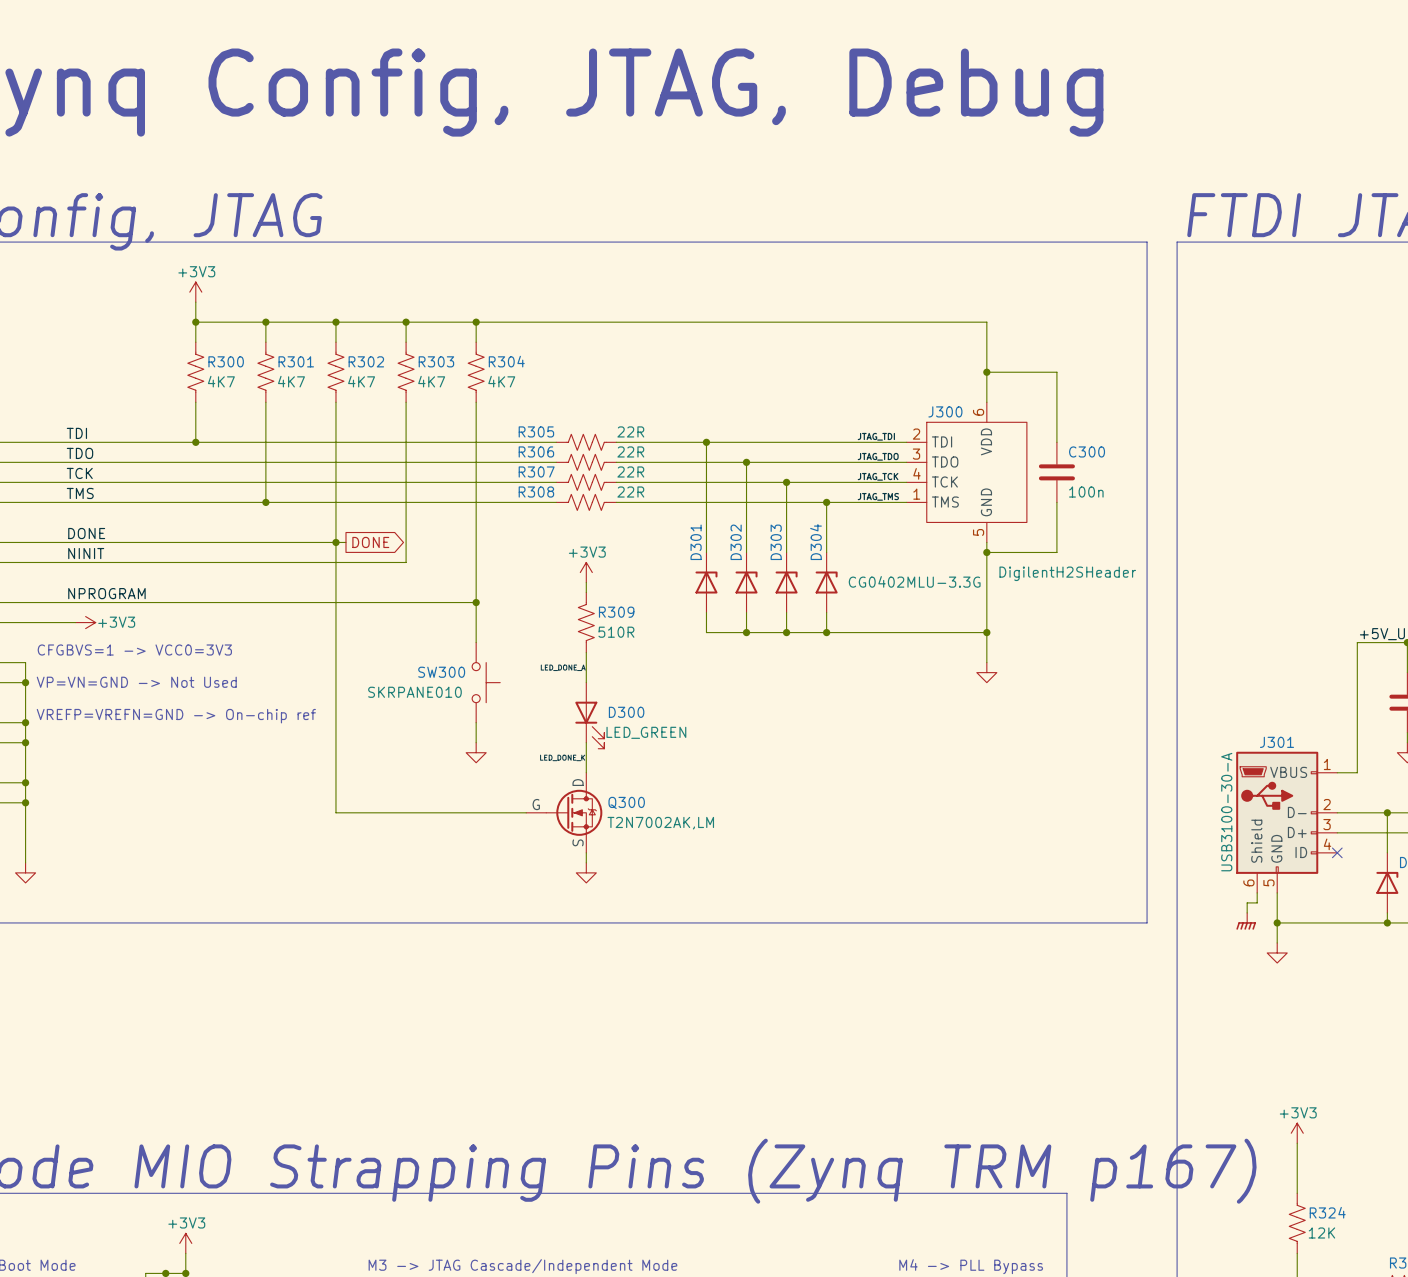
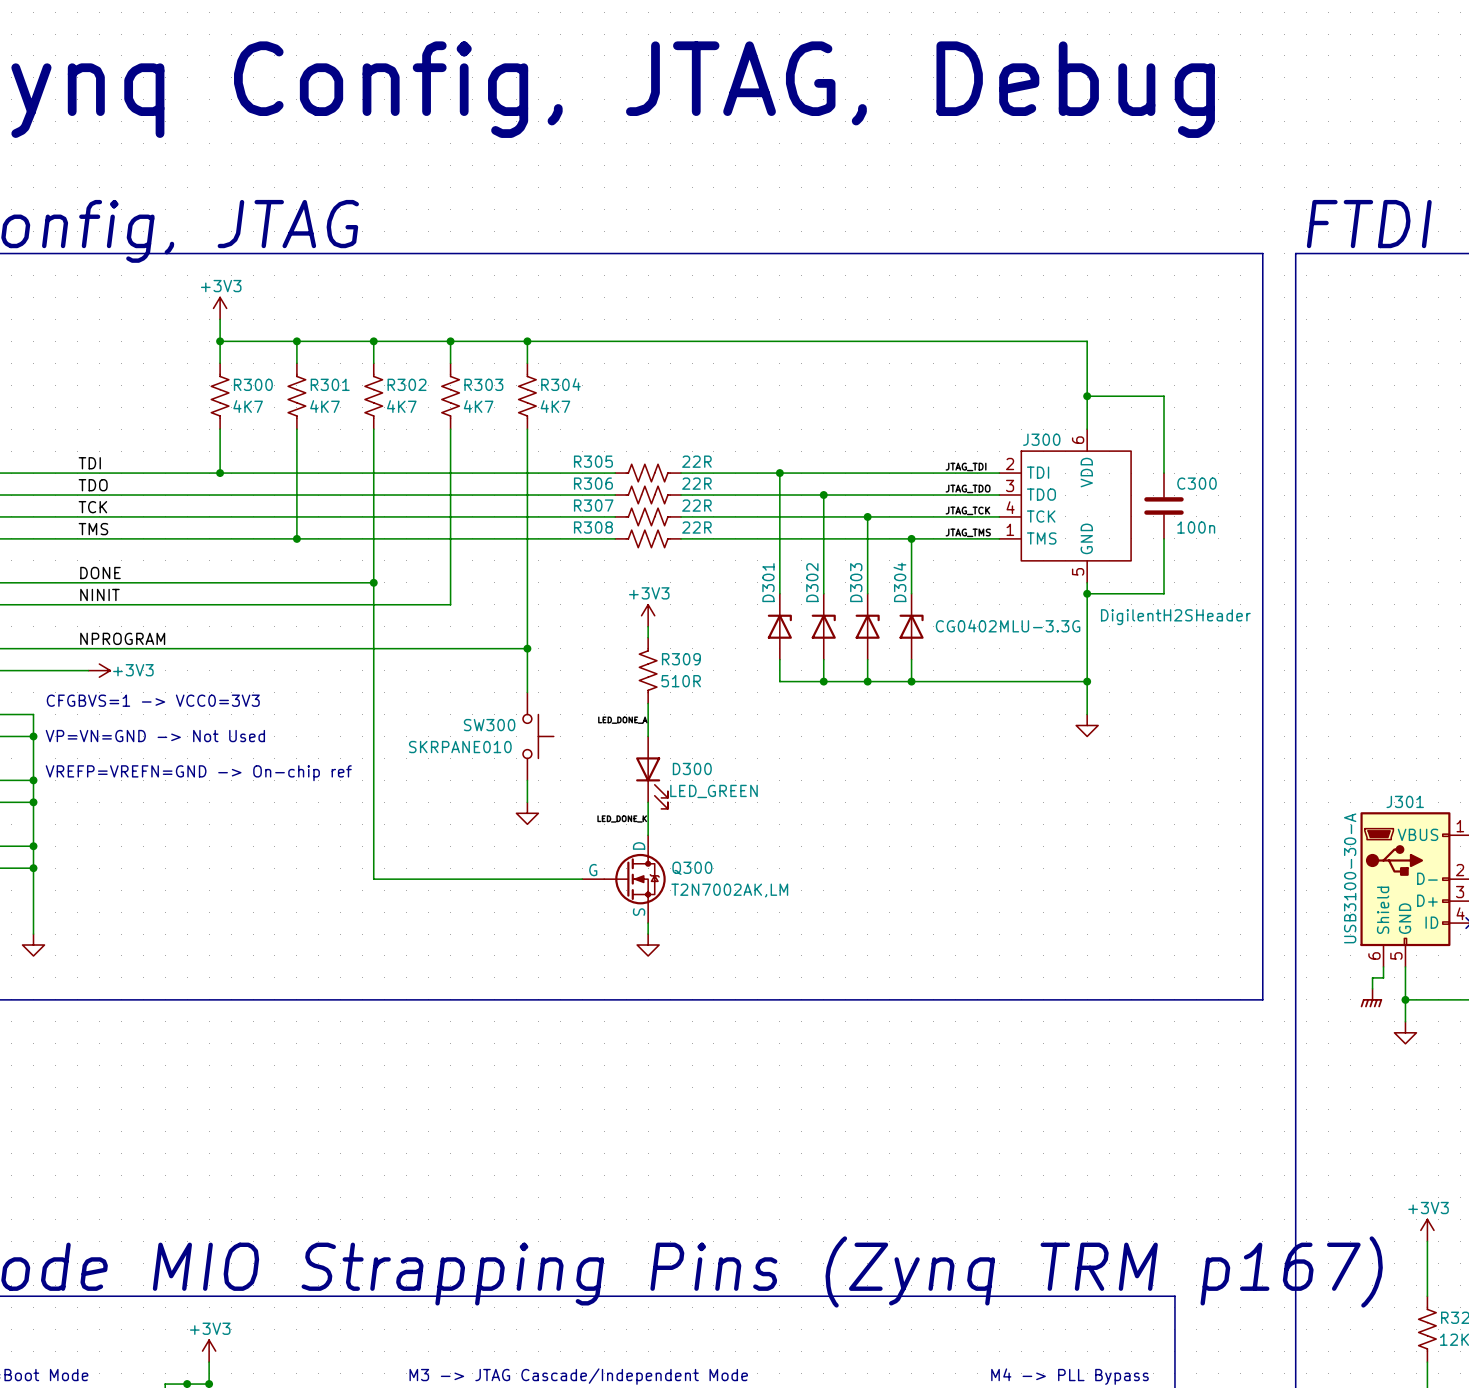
wire: (335, 542) (345, 542) -> none
global label: DONE (370, 542) -> none

